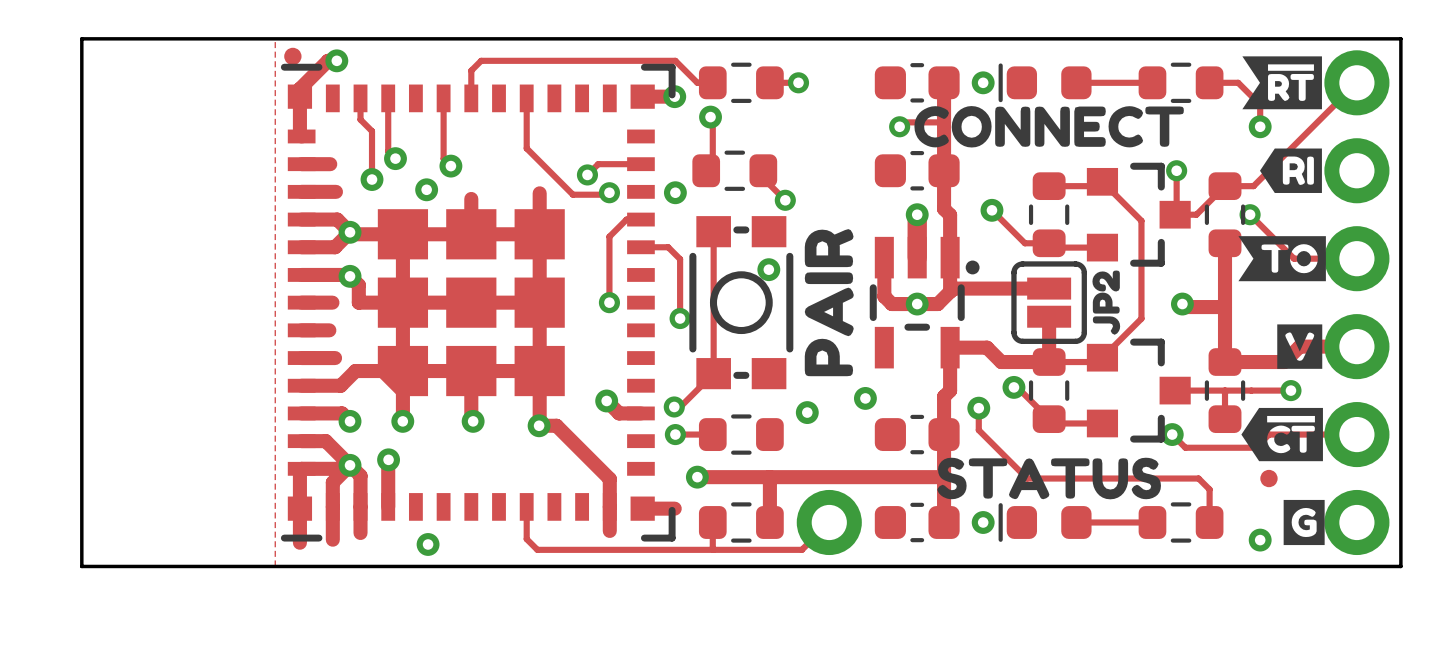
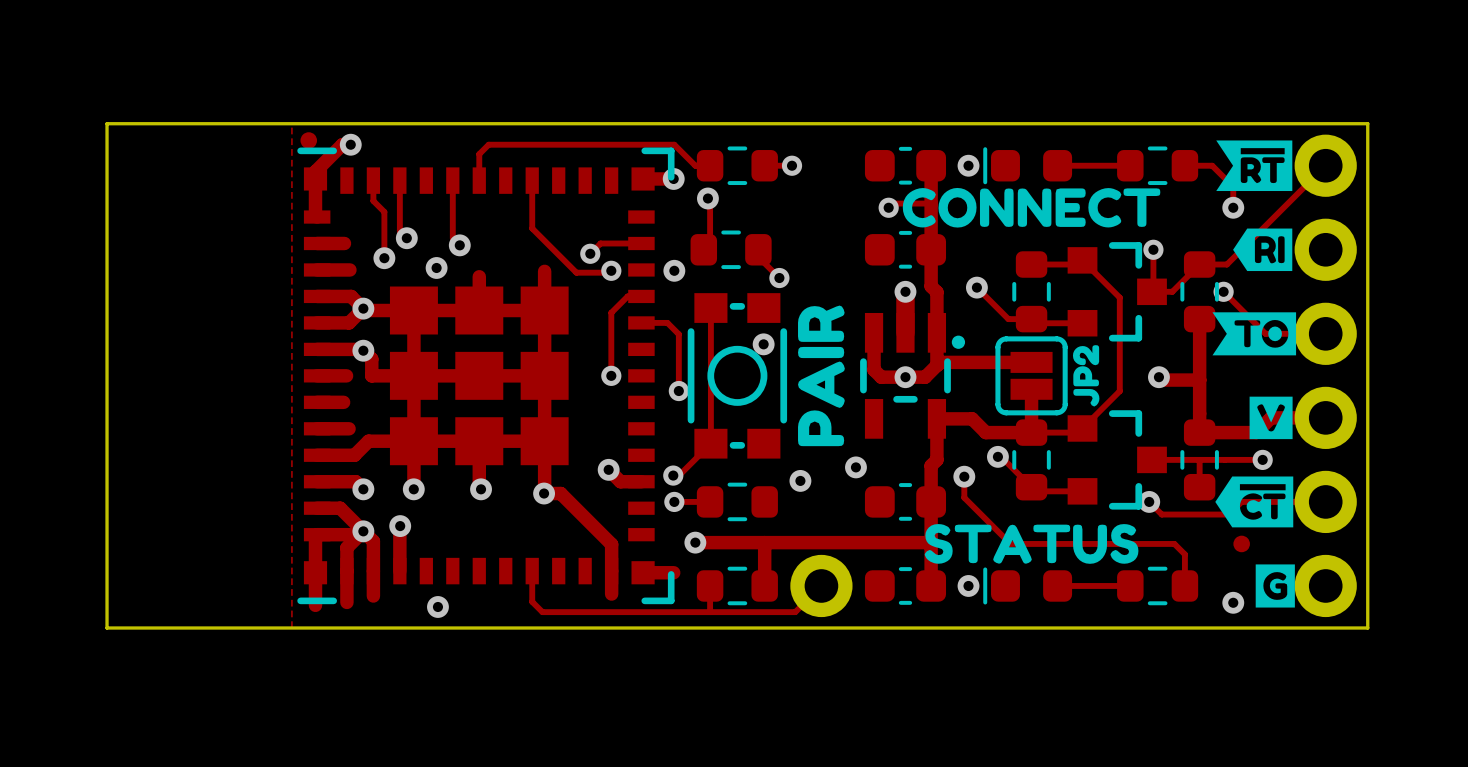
part footprint: [280, 63, 676, 542] -> [297, 147, 675, 605]

